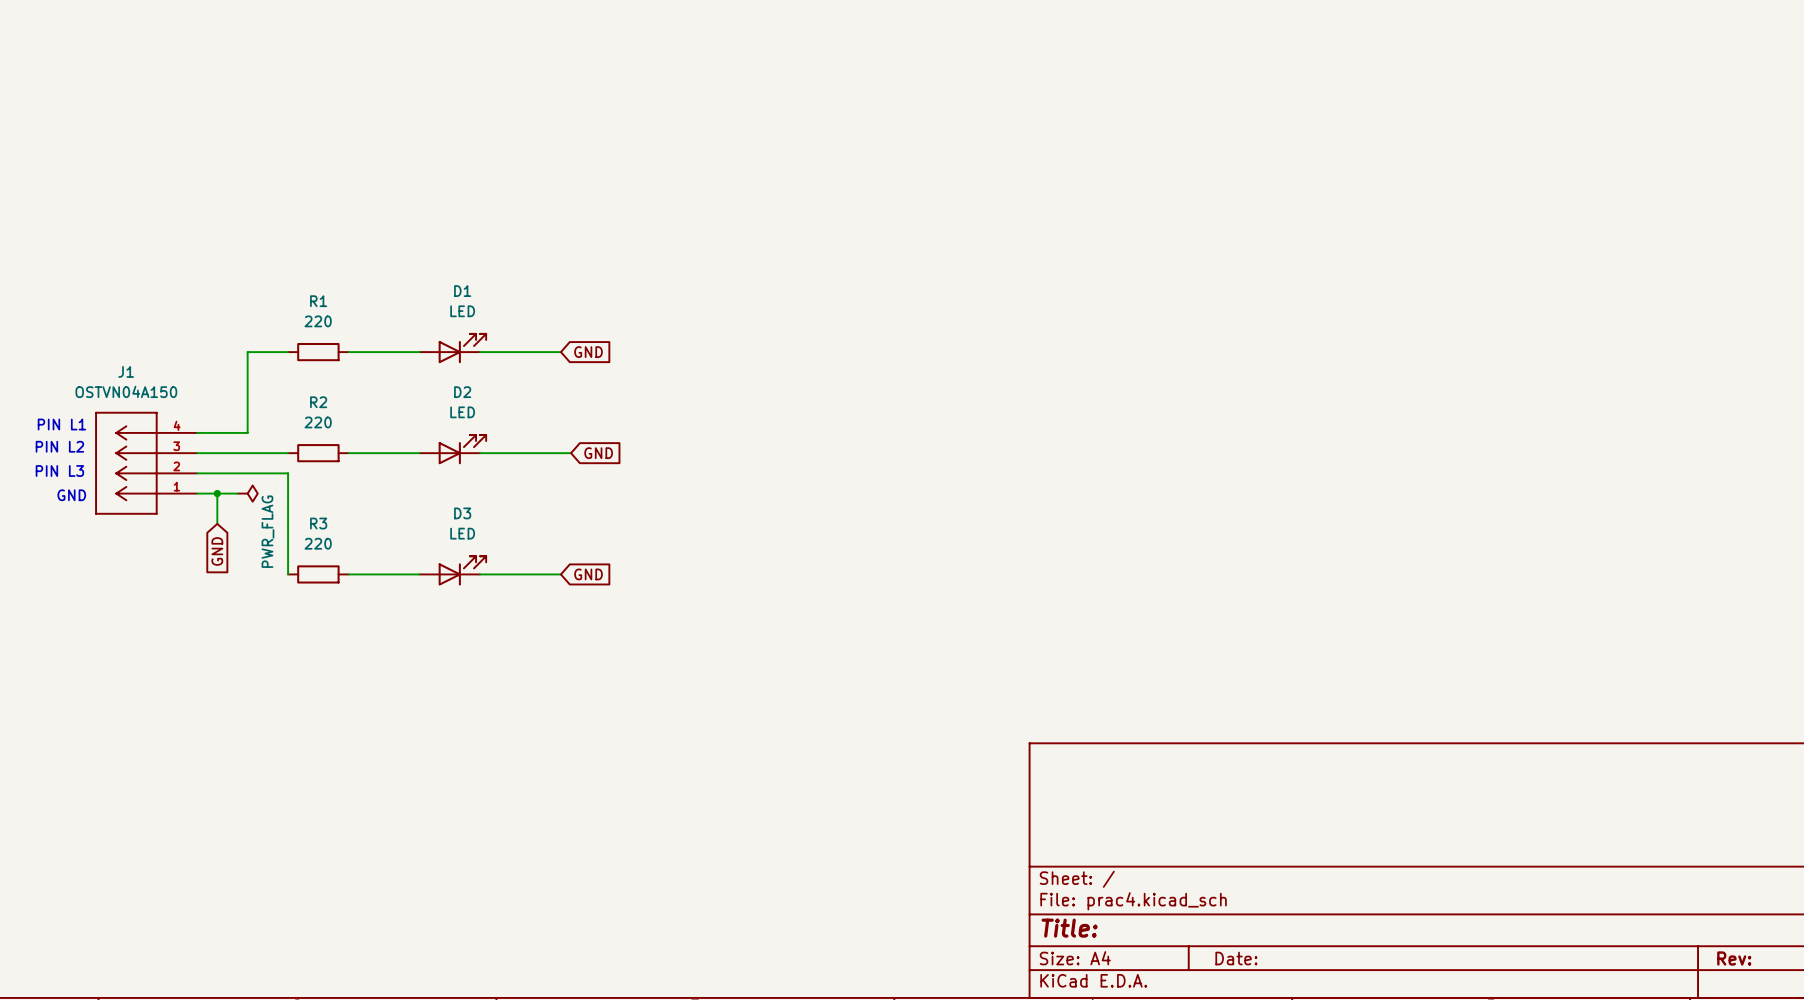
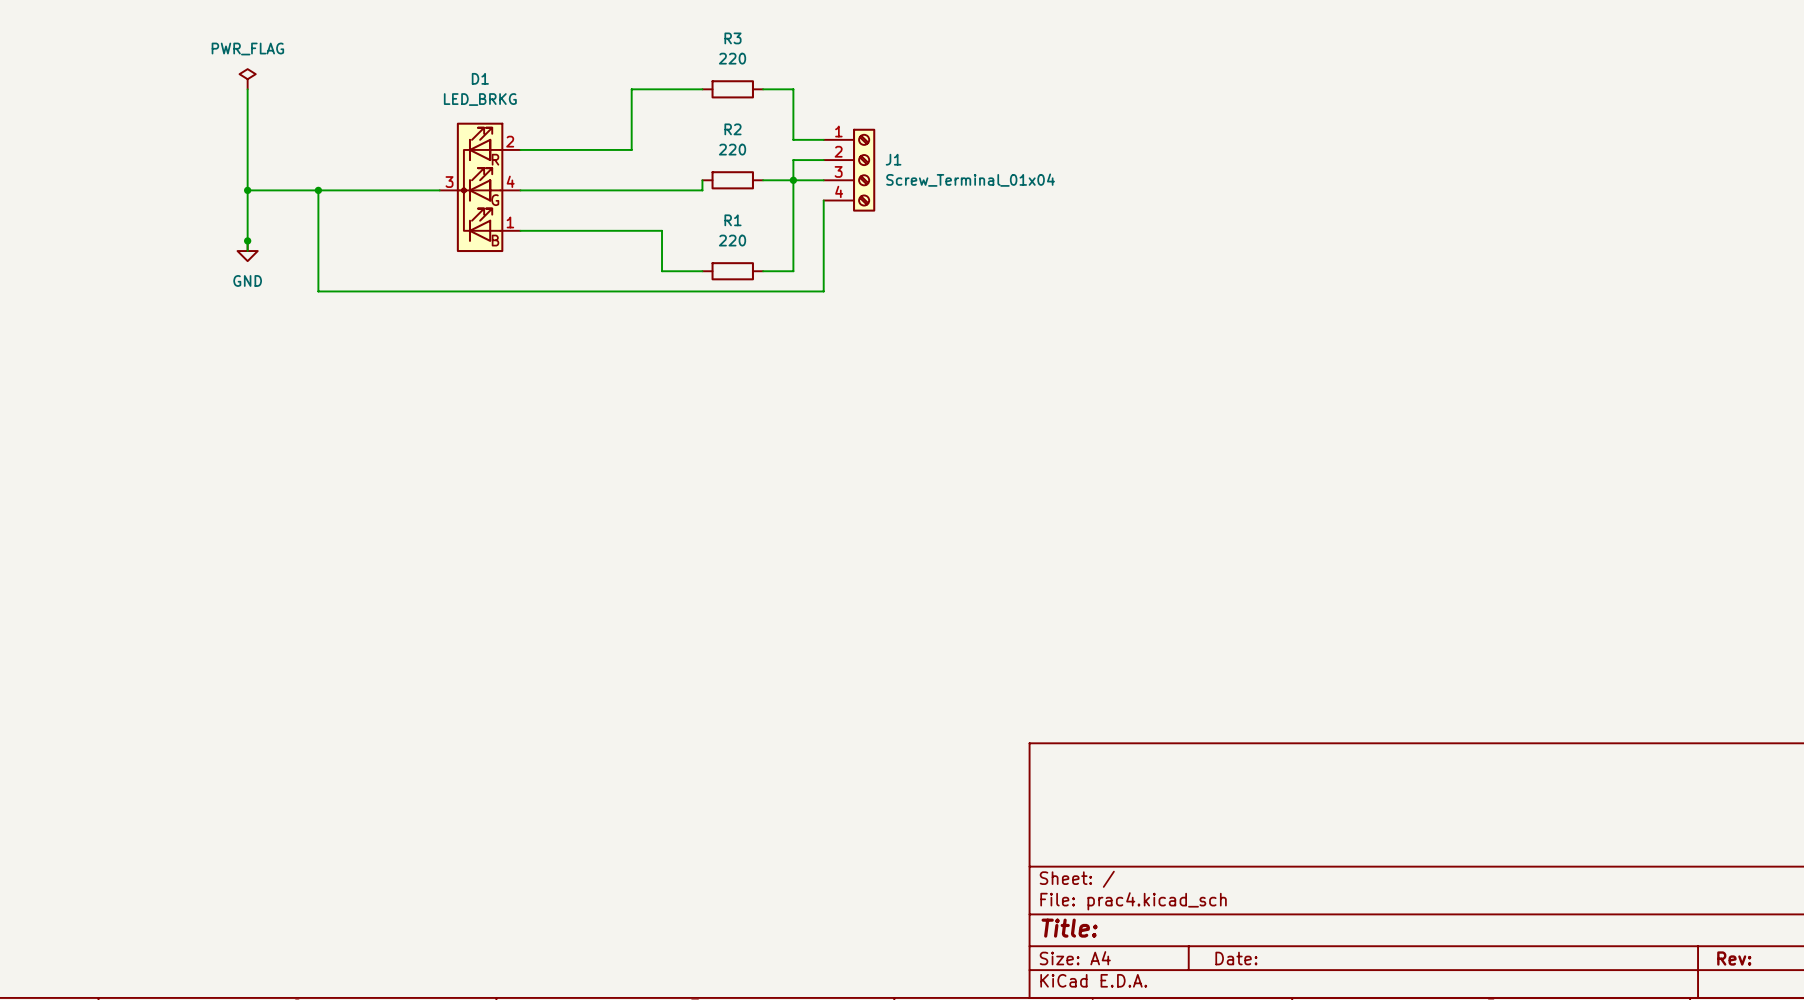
power symbol: none -> PWR_FLAG (247, 79)
wire: none -> (247, 89) (247, 251)
wire: none -> (702, 89) (631, 89) (631, 149) (520, 149)
wire: none -> (763, 89) (793, 89) (793, 139) (823, 139)
wire: none -> (823, 160) (793, 160) (793, 271) (763, 271)
wire: none -> (702, 180) (702, 190) (520, 190)
wire: none -> (763, 180) (823, 180)
junction: none -> (793, 180)
wire: none -> (247, 190) (439, 190)
junction: none -> (247, 190)
wire: none -> (318, 190) (318, 291) (823, 291) (823, 200)
junction: none -> (318, 190)
wire: none -> (520, 230) (662, 230) (662, 271) (702, 271)
junction: none -> (247, 240)
power symbol: none -> GND (247, 251)
D1 name position: D1 (462, 291) -> D1 (480, 78)
D1 value: LED (462, 311) -> LED_BRKG (480, 99)
D1 symbol: [419, 333, 487, 364] -> [439, 122, 521, 253]
wire: (288, 352) (247, 352) (247, 432) (197, 432) -> none
R1 position: (318, 352) -> (732, 271)
wire: (348, 352) (419, 352) -> none
wire: (480, 352) (560, 352) -> none
global label: GND (588, 352) -> none
J1 name position: J1 (126, 371) -> J1 (893, 159)
J1 value: OSTVN04A150 (126, 391) -> Screw_Terminal_01x04 (970, 180)
J1 symbol: [95, 412, 198, 515] -> [823, 128, 876, 212]
text: PIN L1 (61, 424) -> none
text: PIN L2 (59, 446) -> none
D2: LED (452, 449) -> none
wire: (197, 453) (288, 453) -> none
R2 position: (318, 453) -> (732, 180)
wire: (348, 453) (419, 453) -> none
wire: (480, 453) (571, 453) -> none
global label: GND (598, 453) -> none
text: PIN L3 (59, 471) -> none
wire: (197, 473) (288, 473) (288, 574) -> none
wire: (197, 493) (237, 493) -> none
wire: (217, 493) (217, 523) -> none
junction: (217, 493) -> none
power symbol: PWR_FLAG (247, 493) -> none
text: GND (71, 495) -> none
global label: GND (217, 551) -> none
D3: LED (452, 570) -> none
R3 position: (318, 574) -> (732, 89)
wire: (348, 574) (419, 574) -> none
wire: (480, 574) (560, 574) -> none
global label: GND (588, 574) -> none

